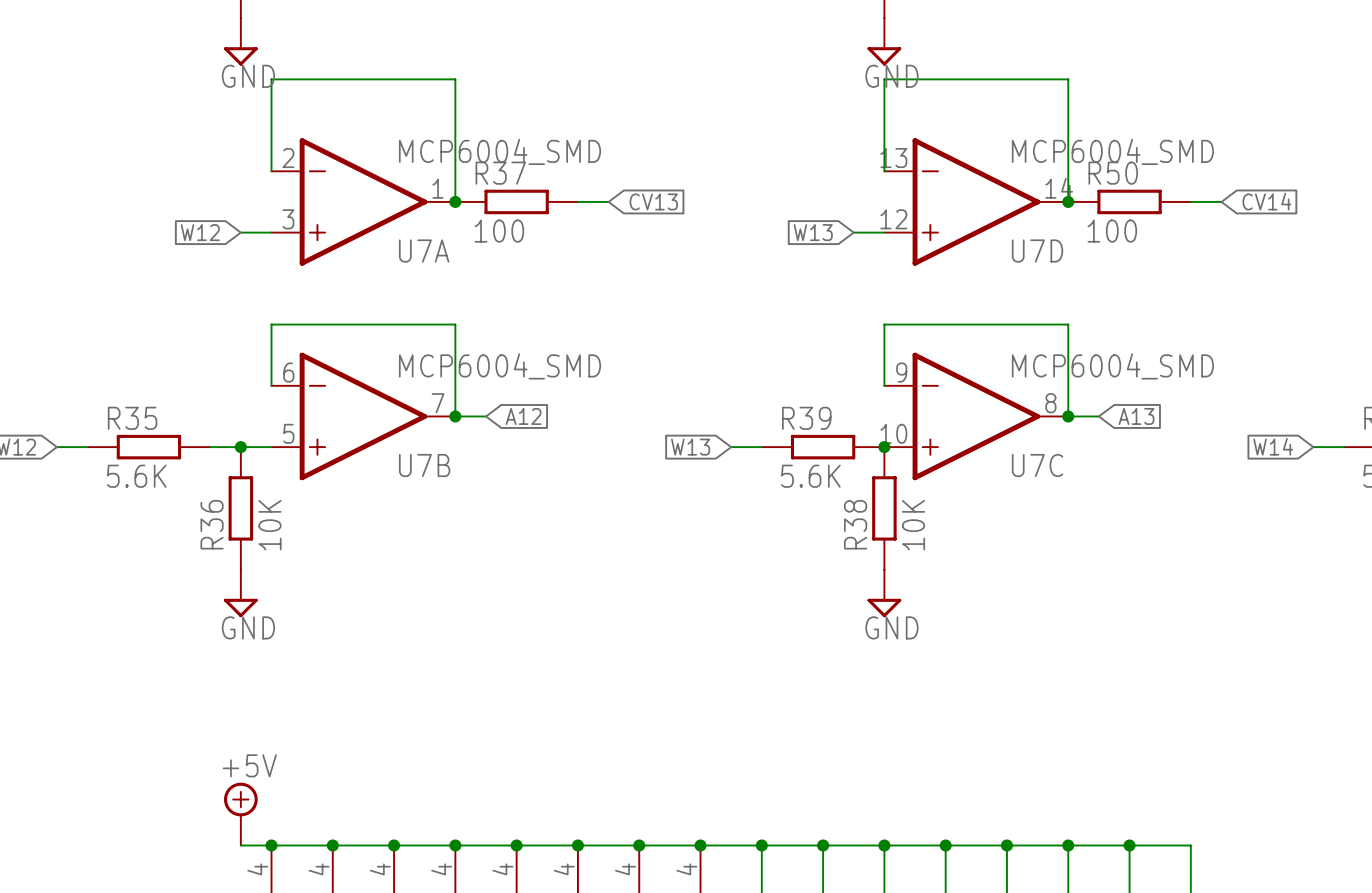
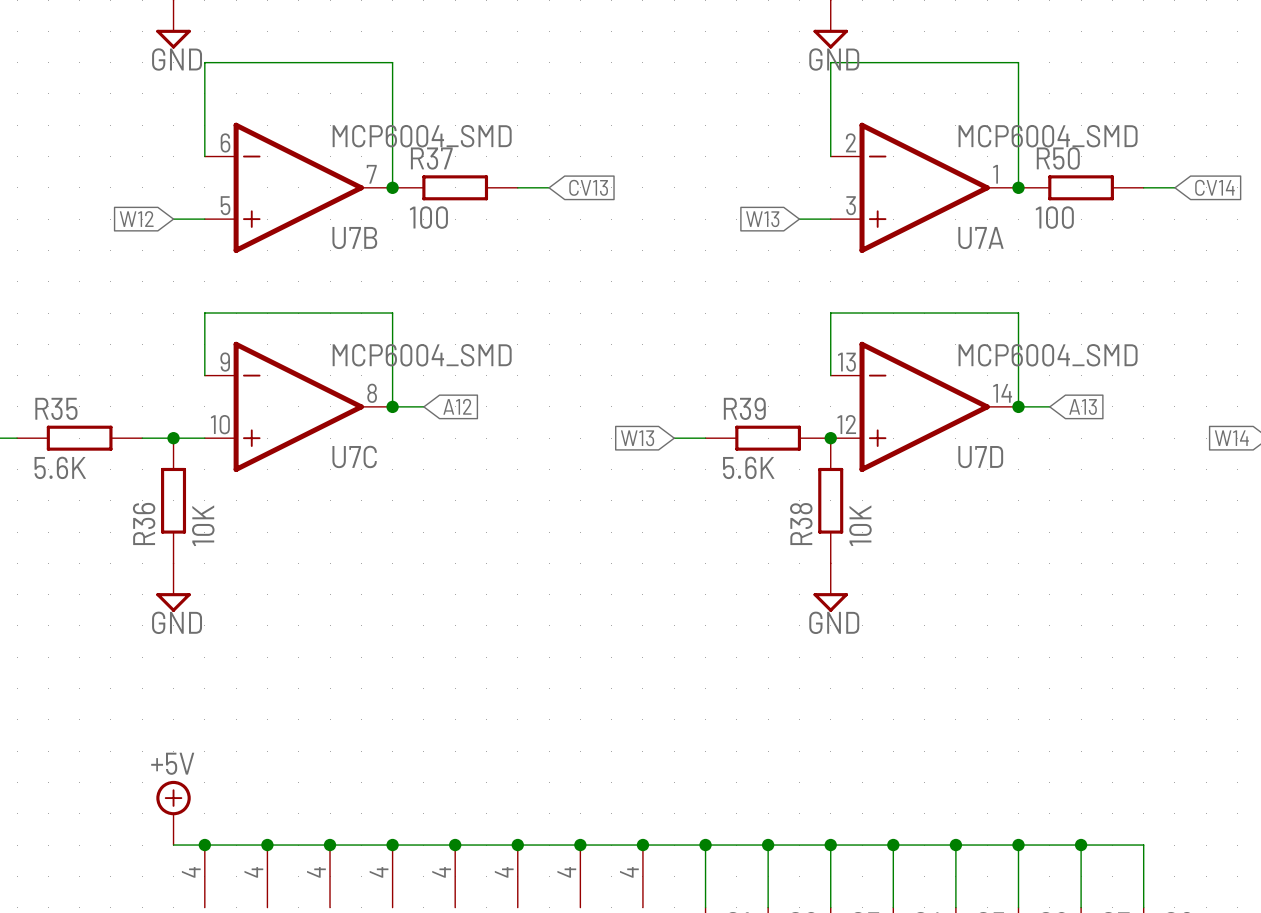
U7A position: (363, 201) -> (924, 187)
U7D position: (976, 201) -> (924, 406)
U7B position: (363, 416) -> (298, 187)
U7C position: (976, 416) -> (298, 406)

